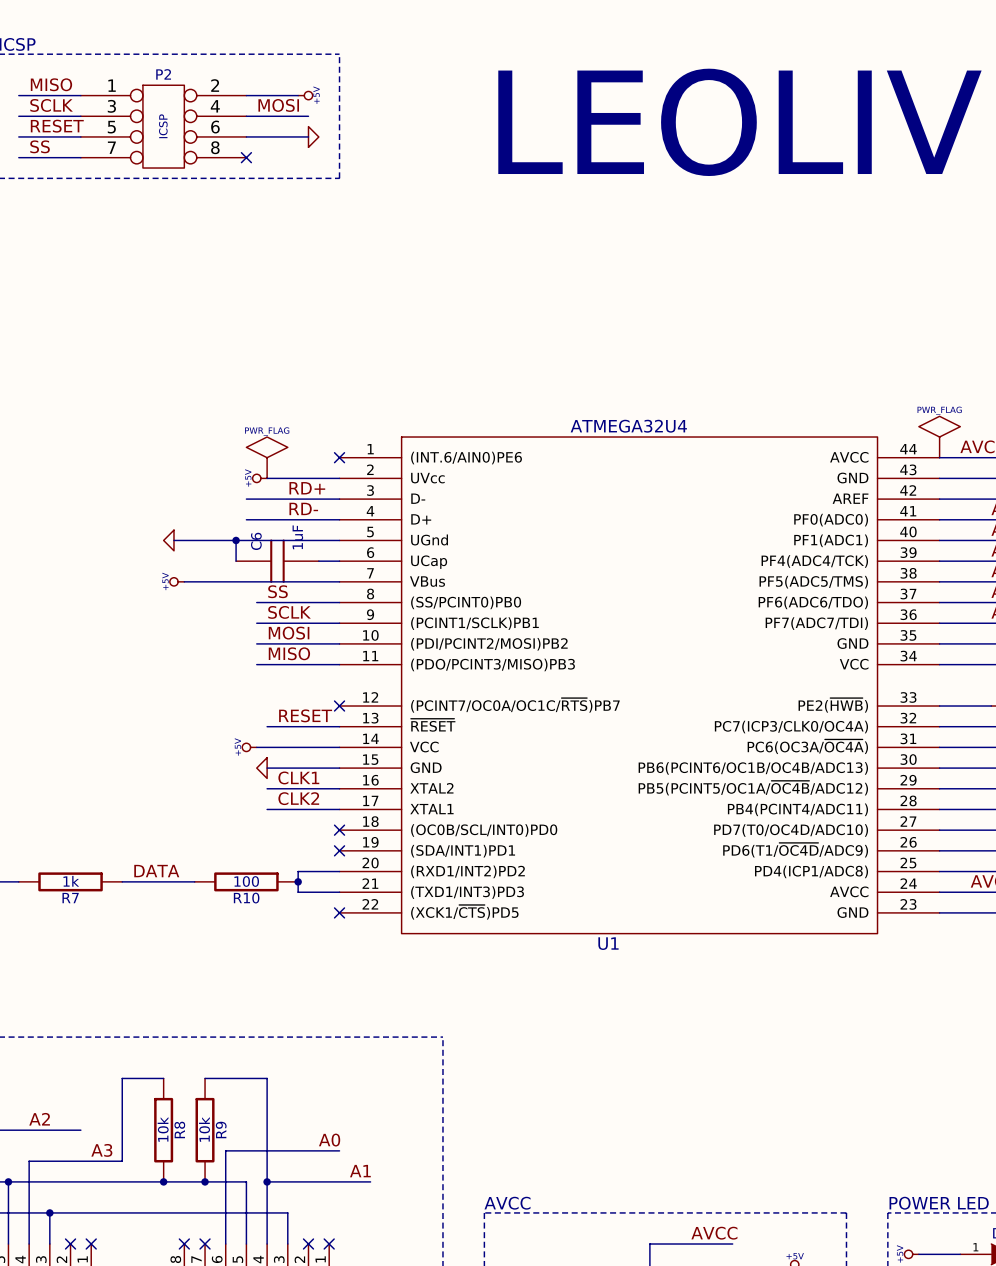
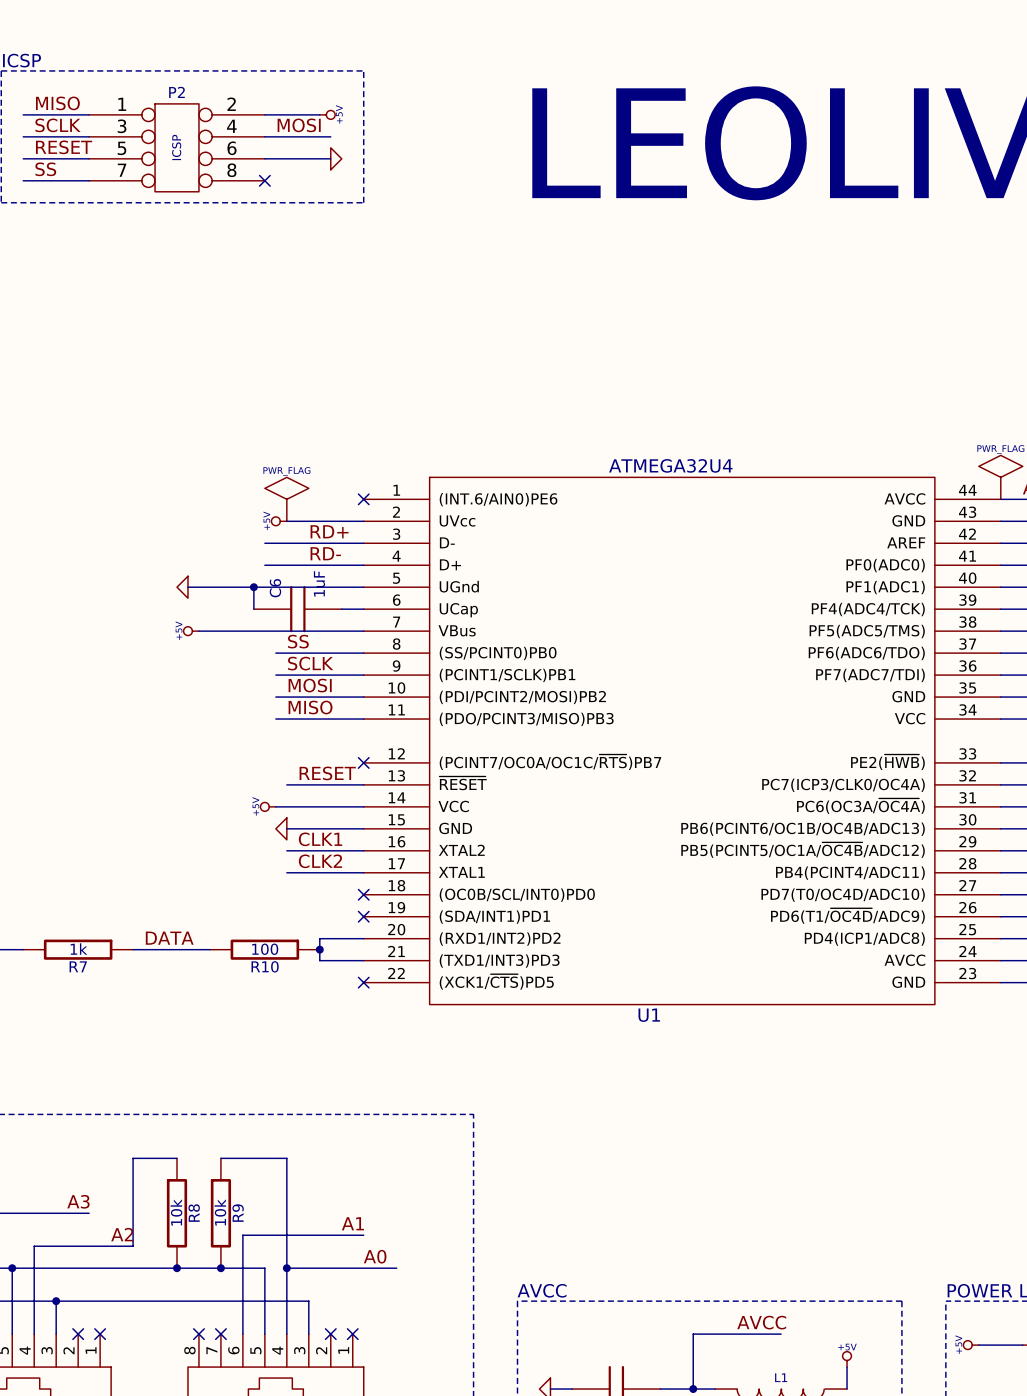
label position: A2 (39, 1119) -> A2 (122, 1234)
label: A0 (329, 1140) -> A1 (352, 1223)
label position: A3 (101, 1150) -> A3 (78, 1201)
label: none -> A0 (375, 1256)
label: A1 (360, 1171) -> none

